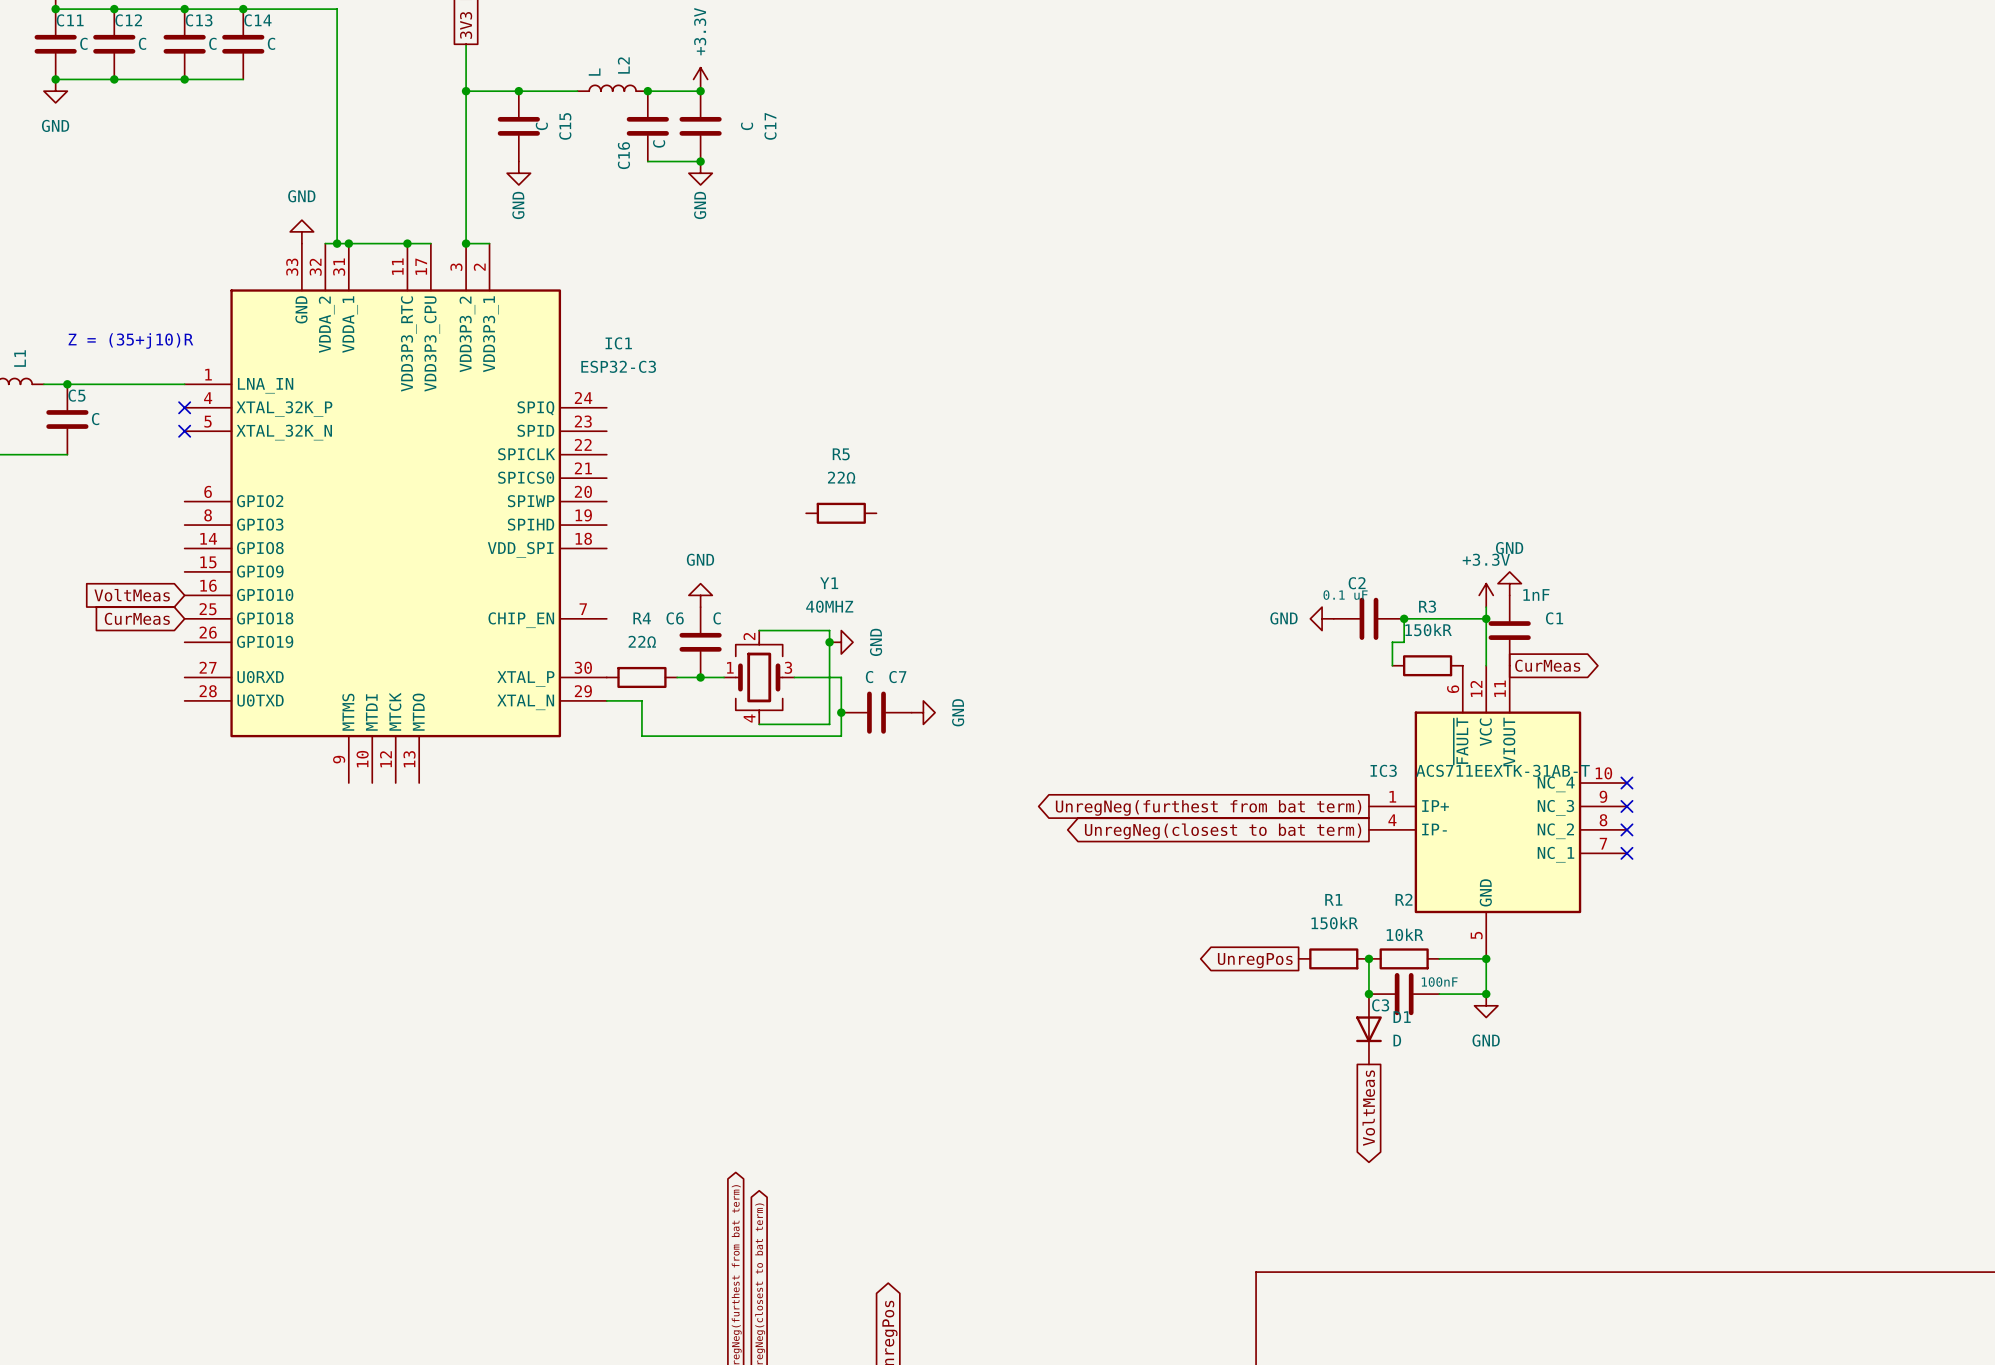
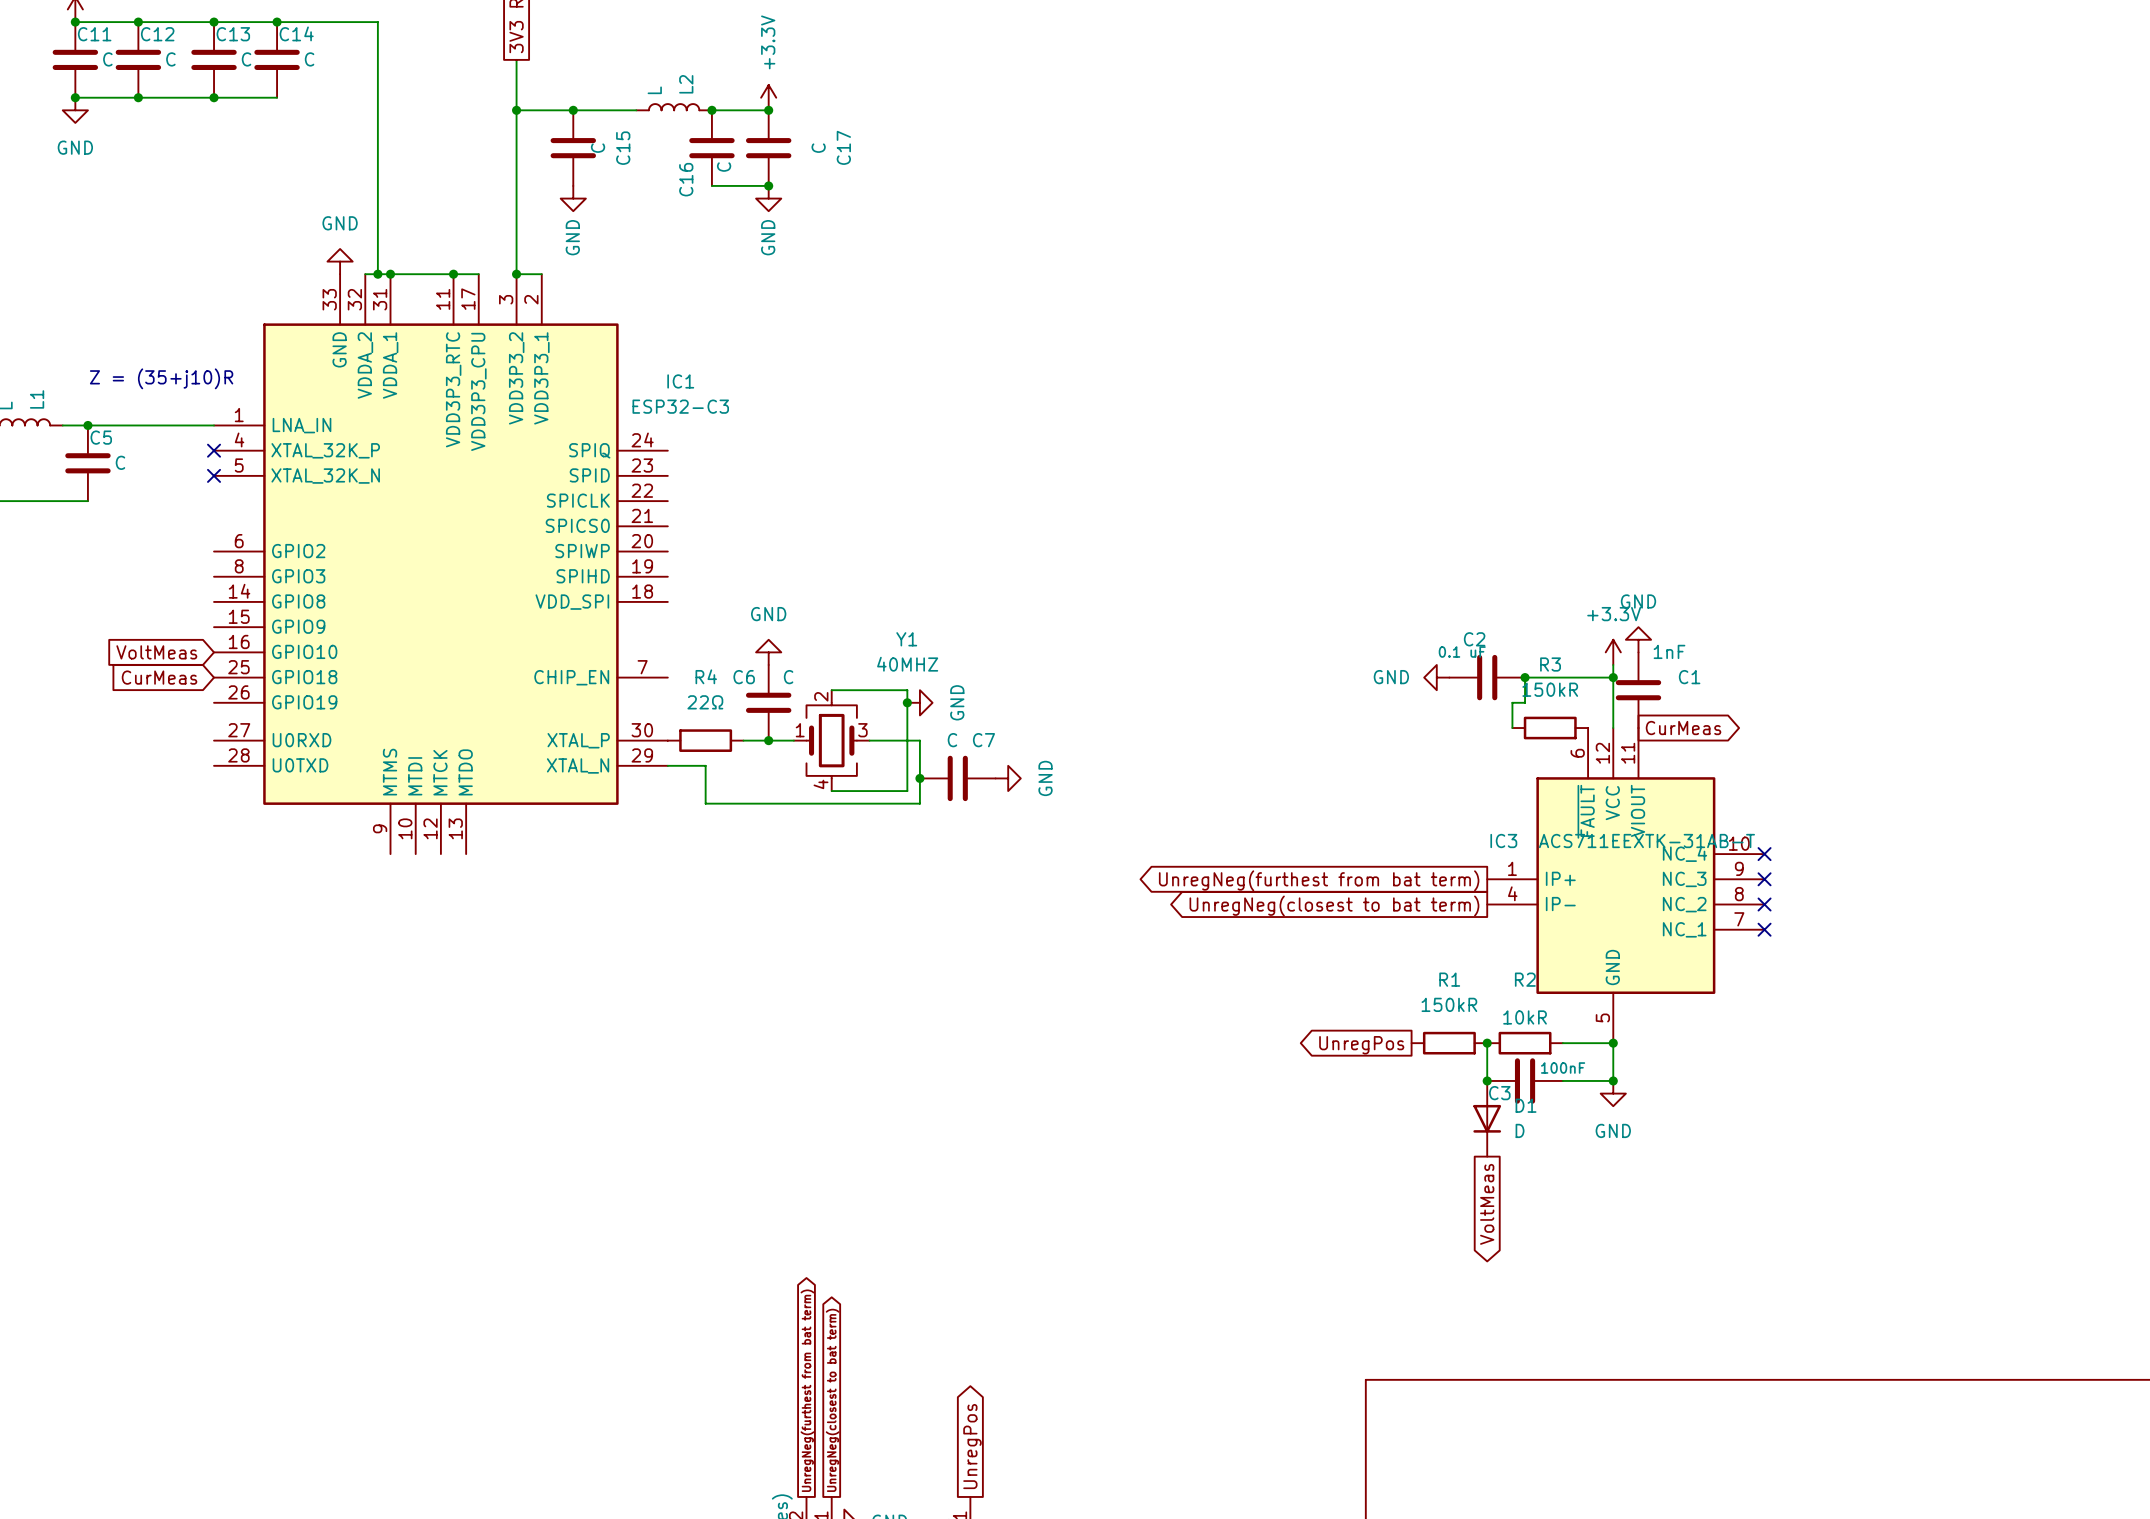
R5: 22Ω (841, 513) -> none

